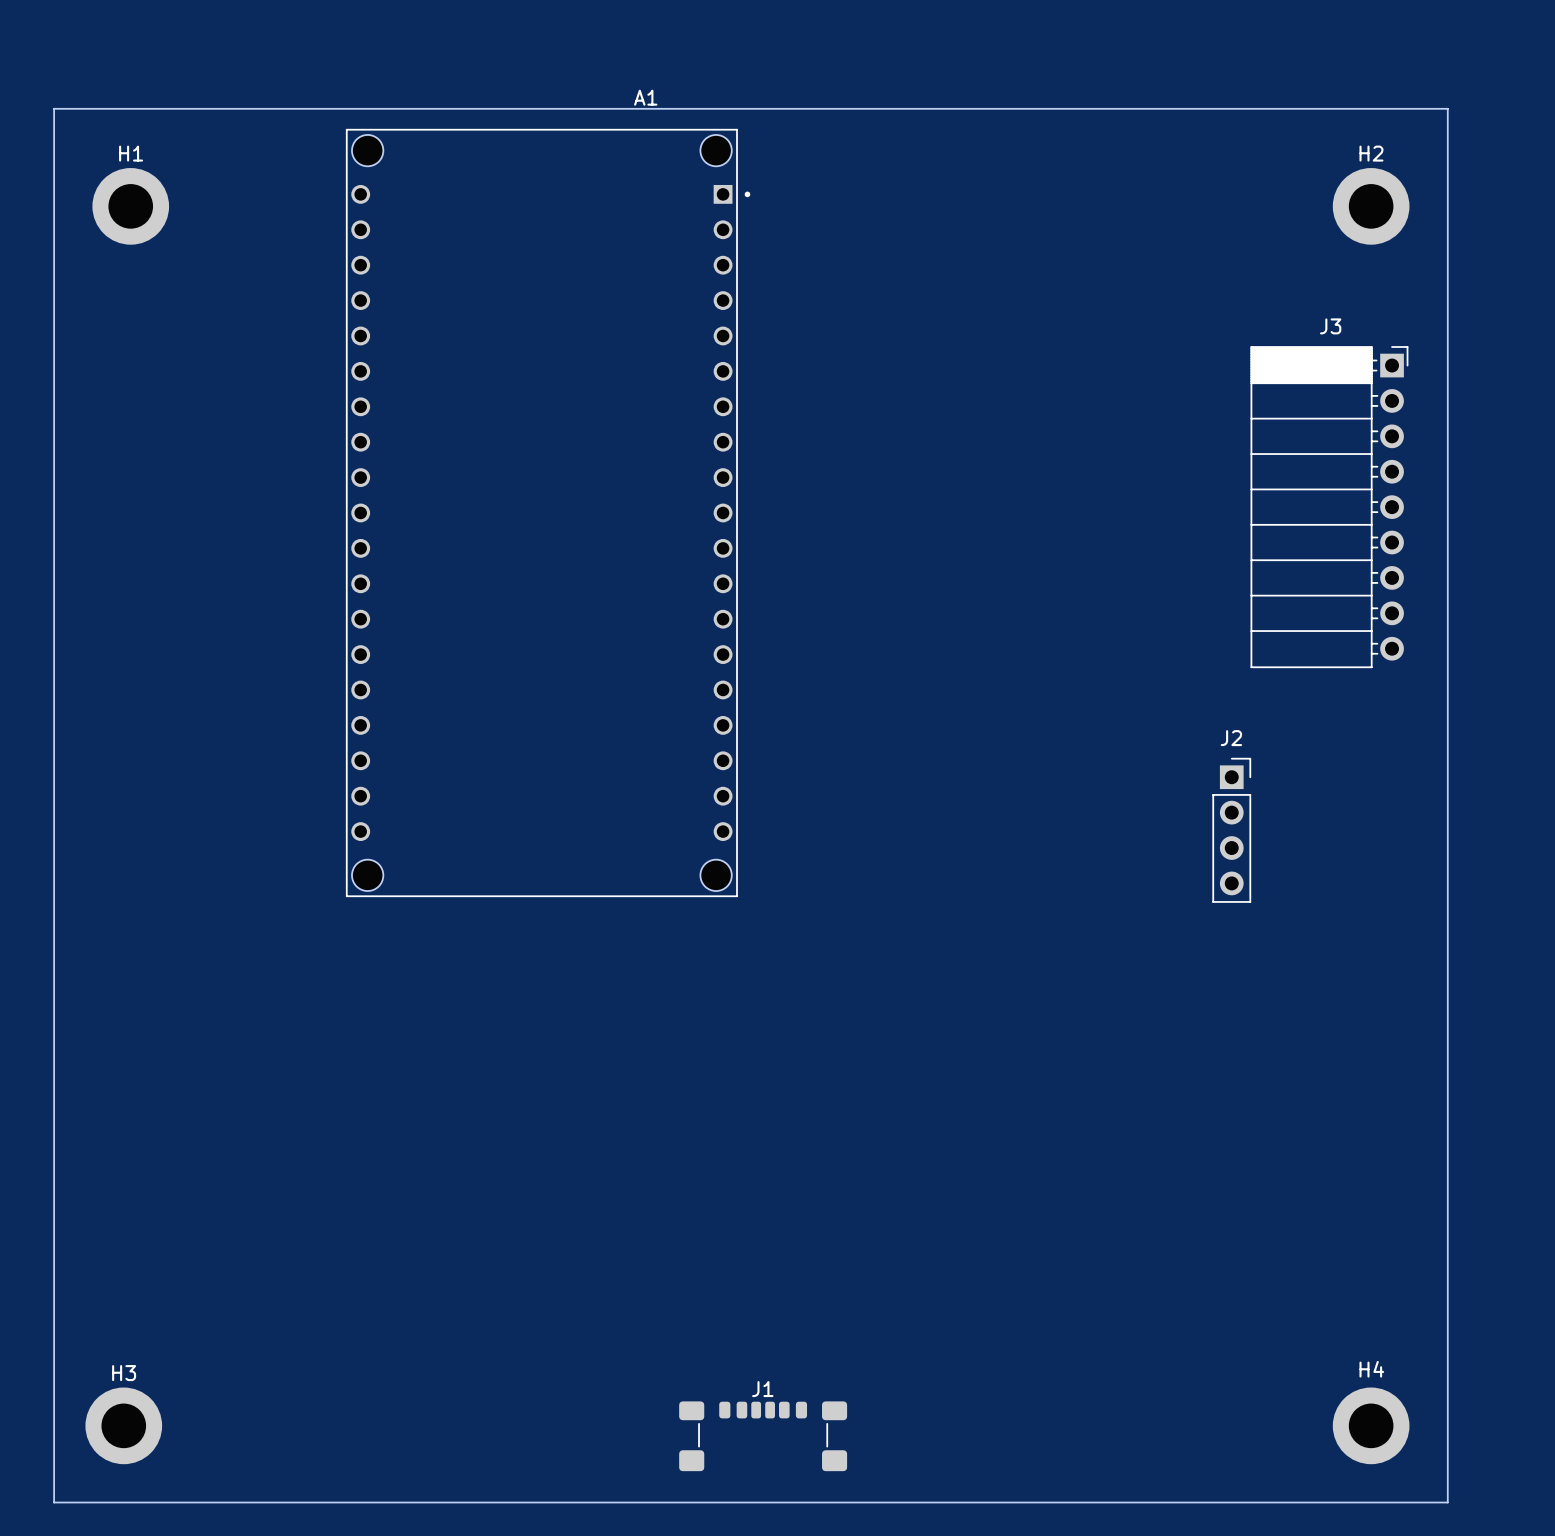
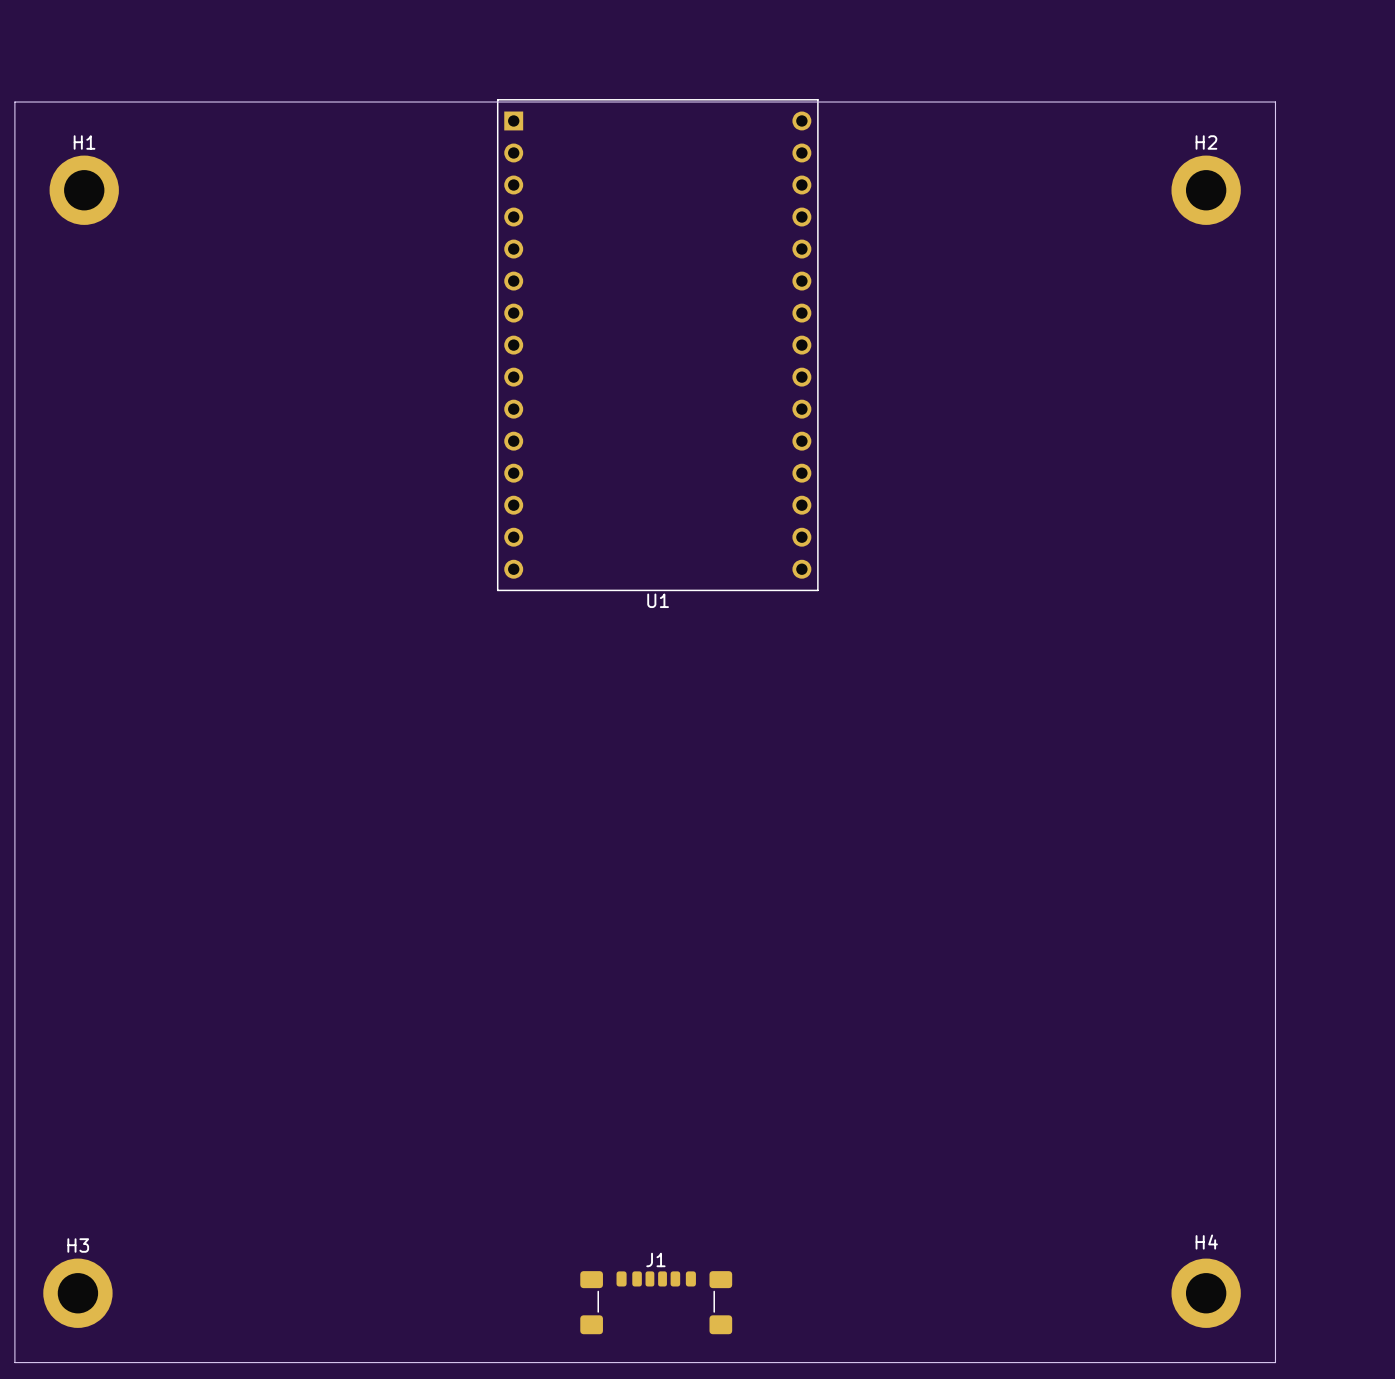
U1: none -> (657, 345)
J3: (1329, 507) -> none
A1: (548, 512) -> none
J2: (1231, 830) -> none

